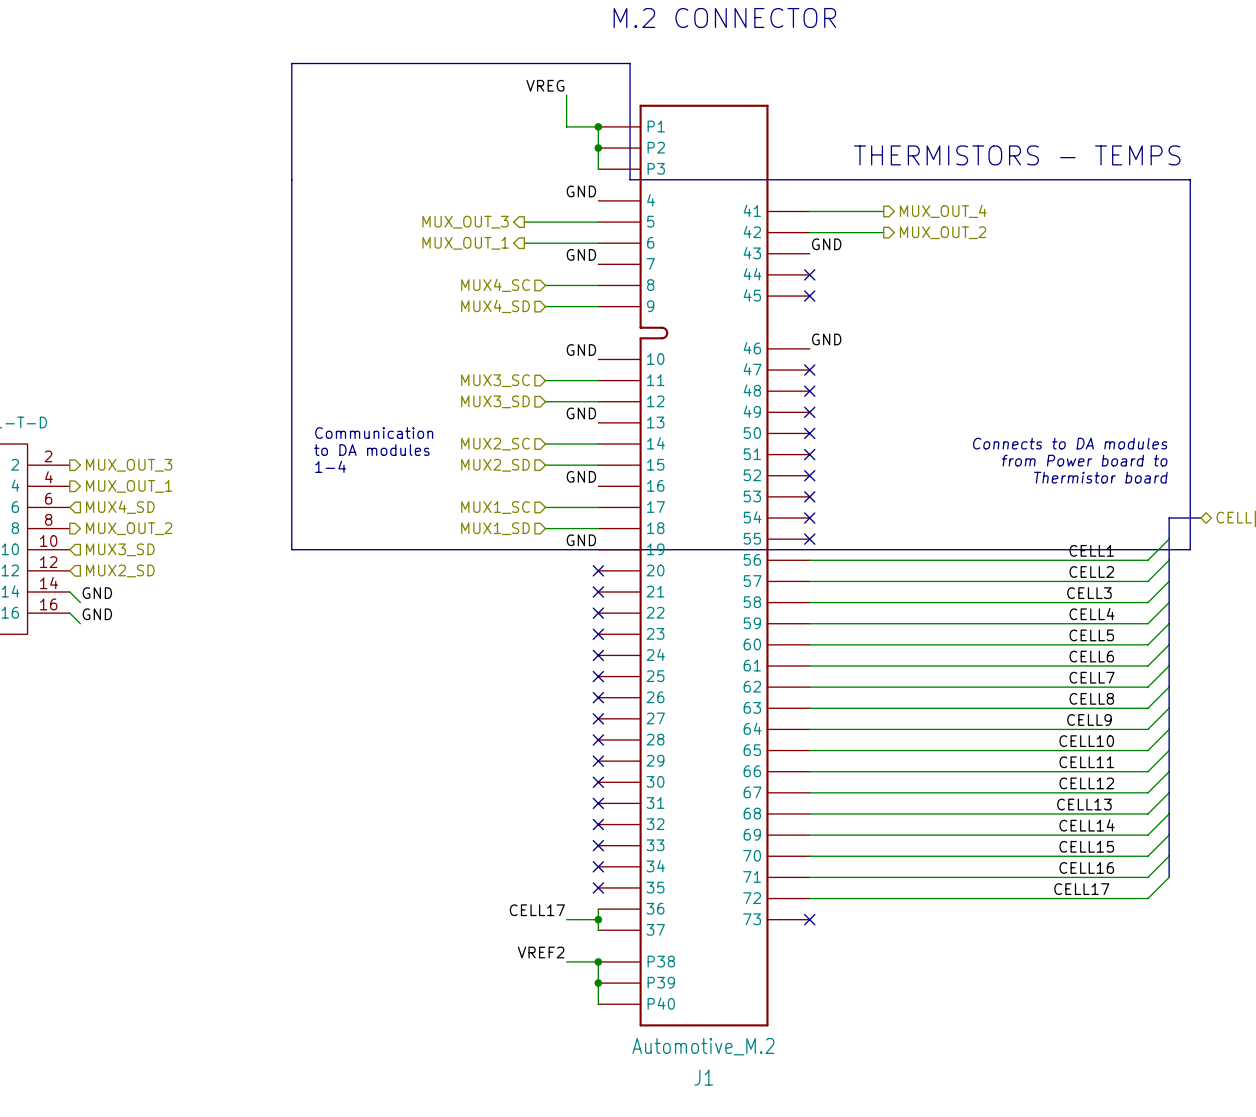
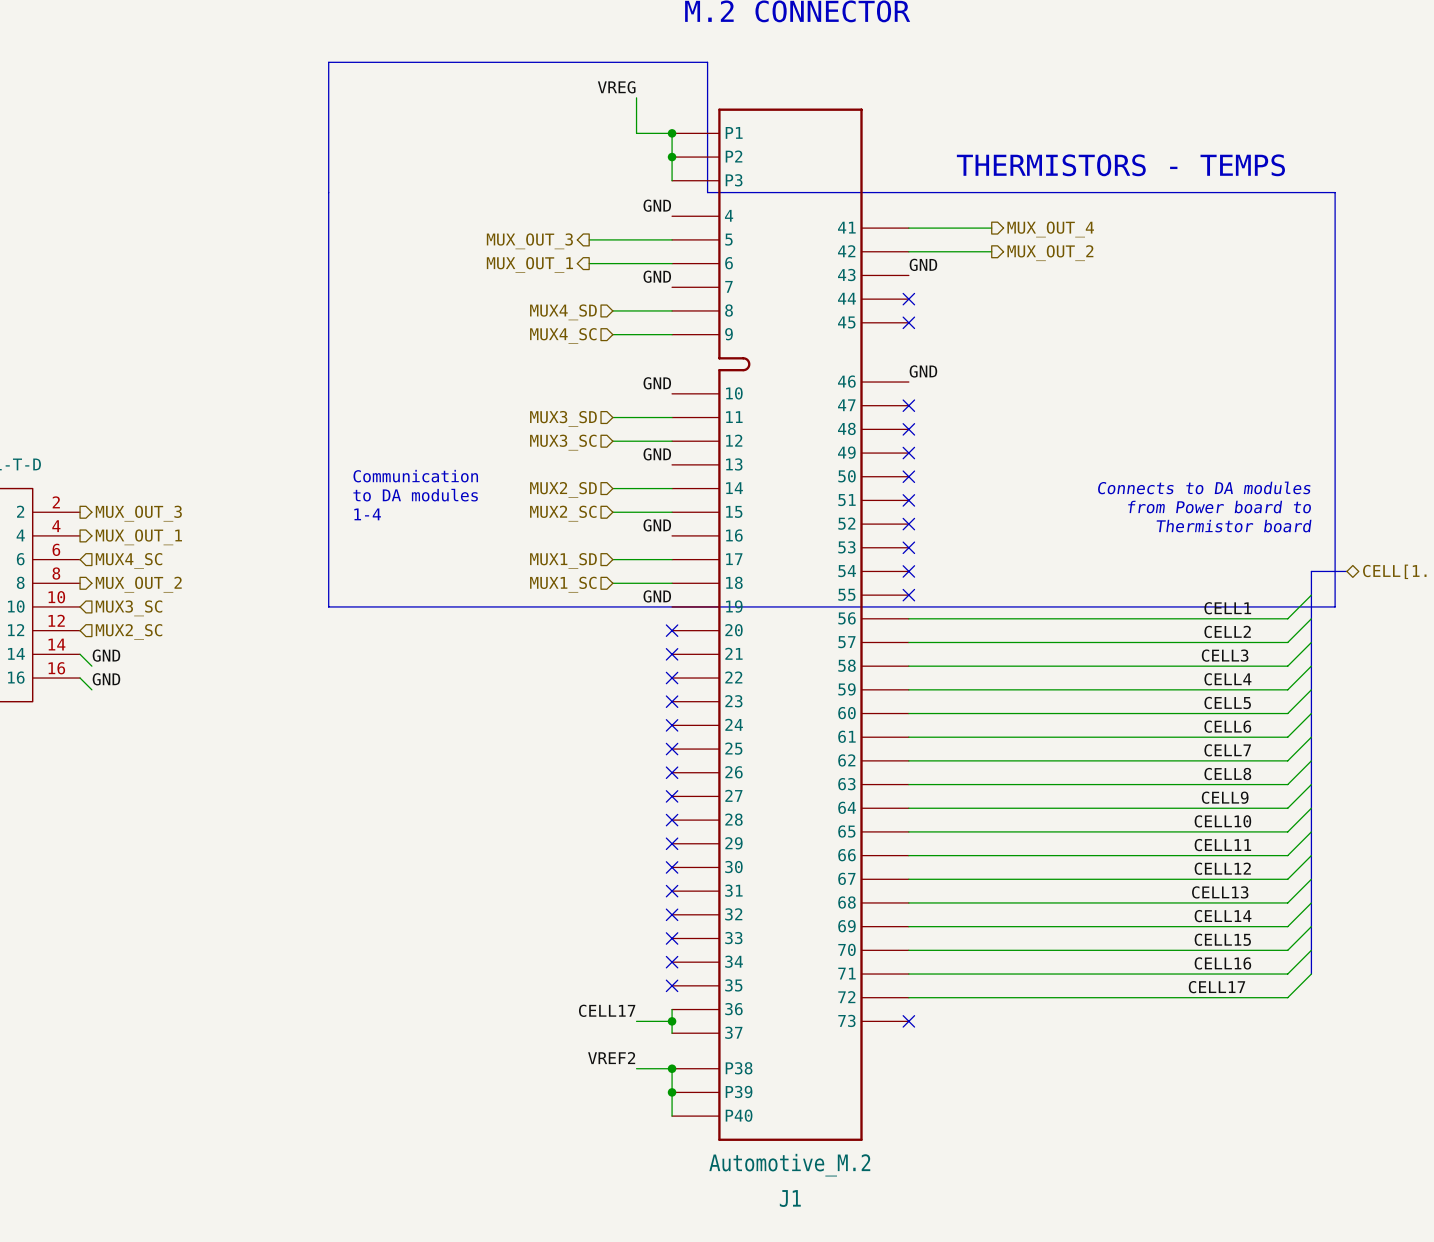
hierarchical label: MUX4_SC (495, 285) -> MUX4_SD (563, 312)
hierarchical label: MUX4_SD (495, 306) -> MUX4_SC (563, 336)
hierarchical label: MUX3_SC (495, 380) -> MUX3_SD (563, 418)
hierarchical label: MUX3_SD (495, 401) -> MUX3_SC (563, 442)
hierarchical label: MUX2_SC (495, 444) -> MUX2_SD (563, 489)
hierarchical label: MUX2_SD (495, 465) -> MUX2_SC (563, 513)
hierarchical label: MUX4_SD (120, 507) -> MUX4_SC (129, 560)
hierarchical label: MUX1_SC (495, 507) -> MUX1_SD (563, 560)
hierarchical label: MUX1_SD (495, 528) -> MUX1_SC (563, 584)
hierarchical label: MUX3_SD (120, 549) -> MUX3_SC (129, 608)
hierarchical label: MUX2_SD (120, 570) -> MUX2_SC (129, 632)

